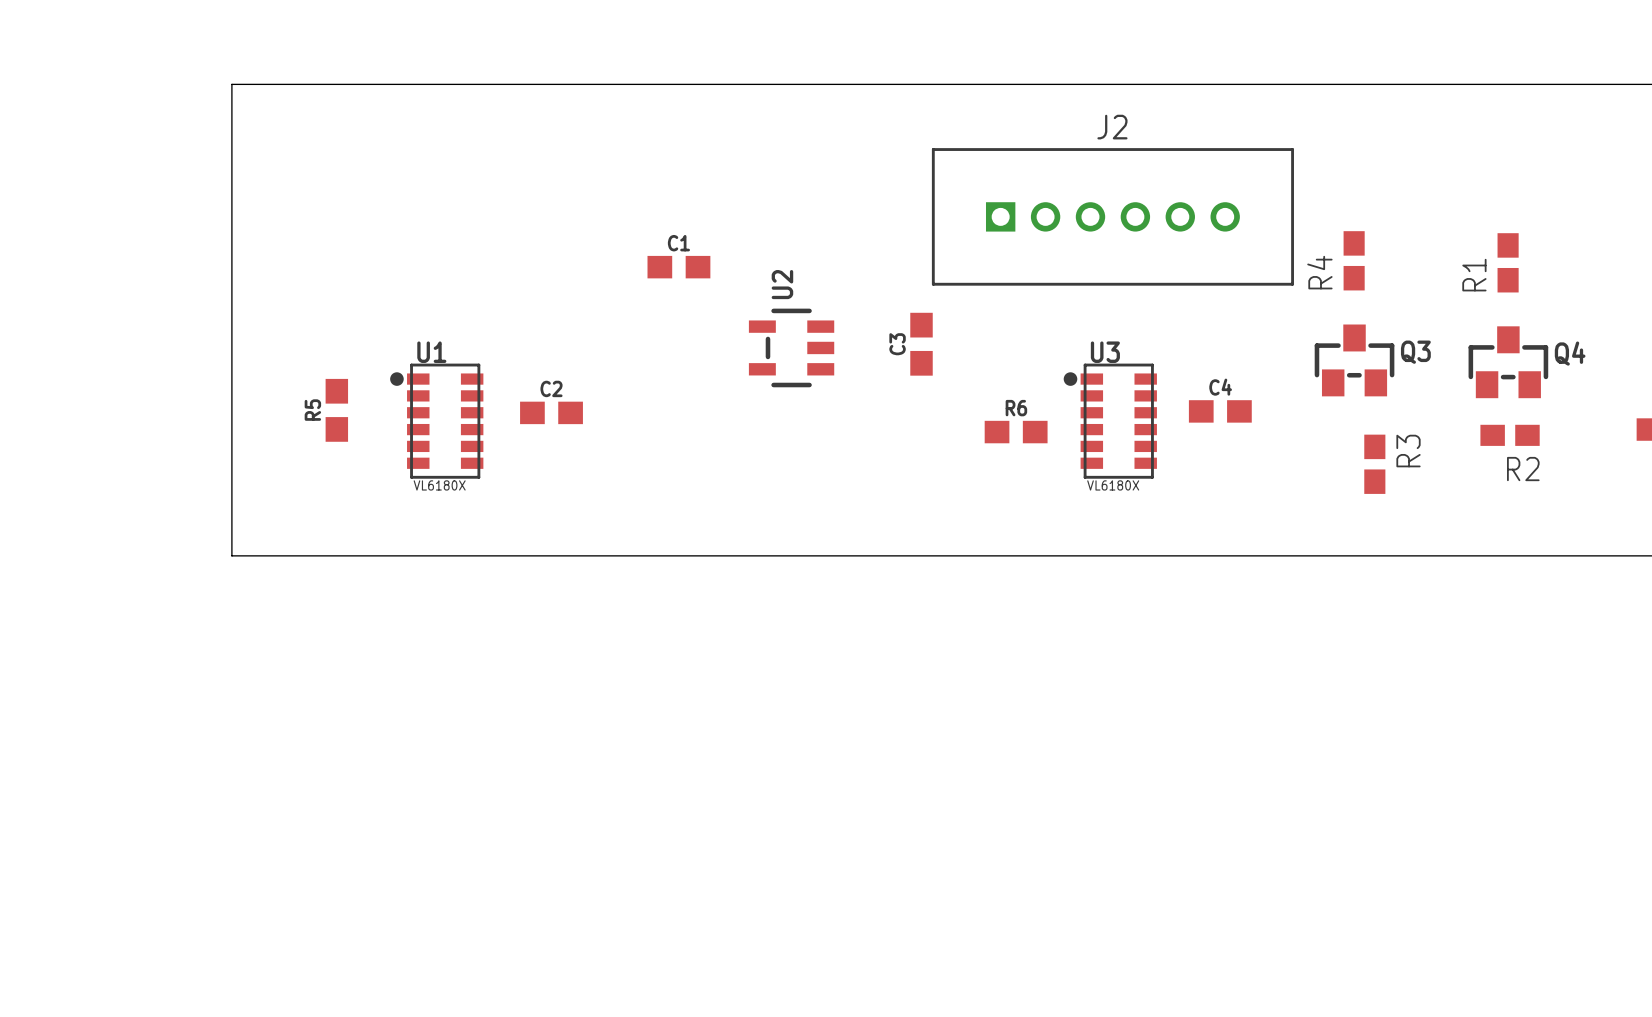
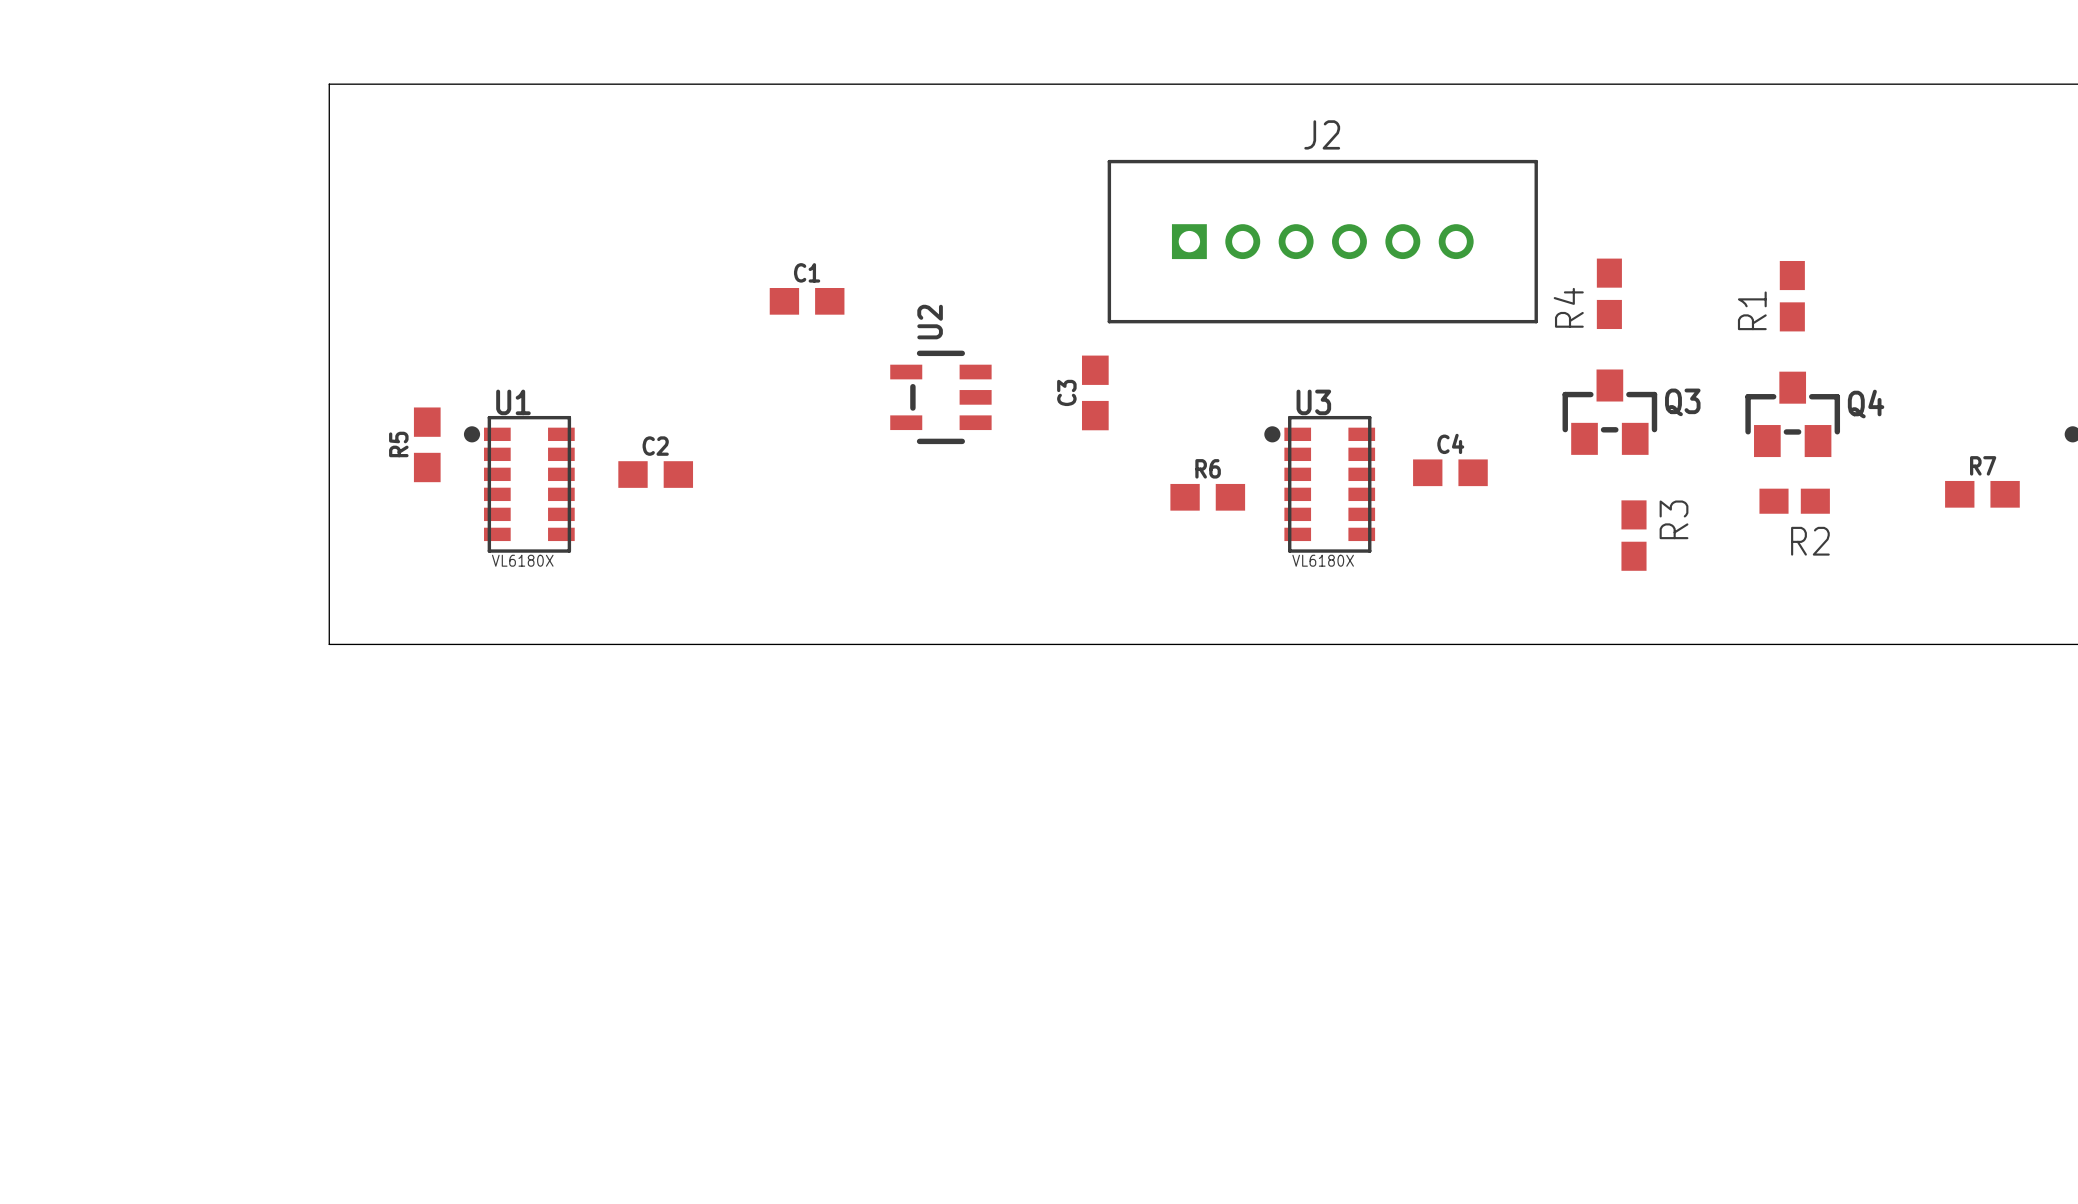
board edge: (276, 84) (231, 84) (231, 555) (276, 555) -> (329, 84) (329, 644)
R5 position: (336, 410) -> (427, 444)

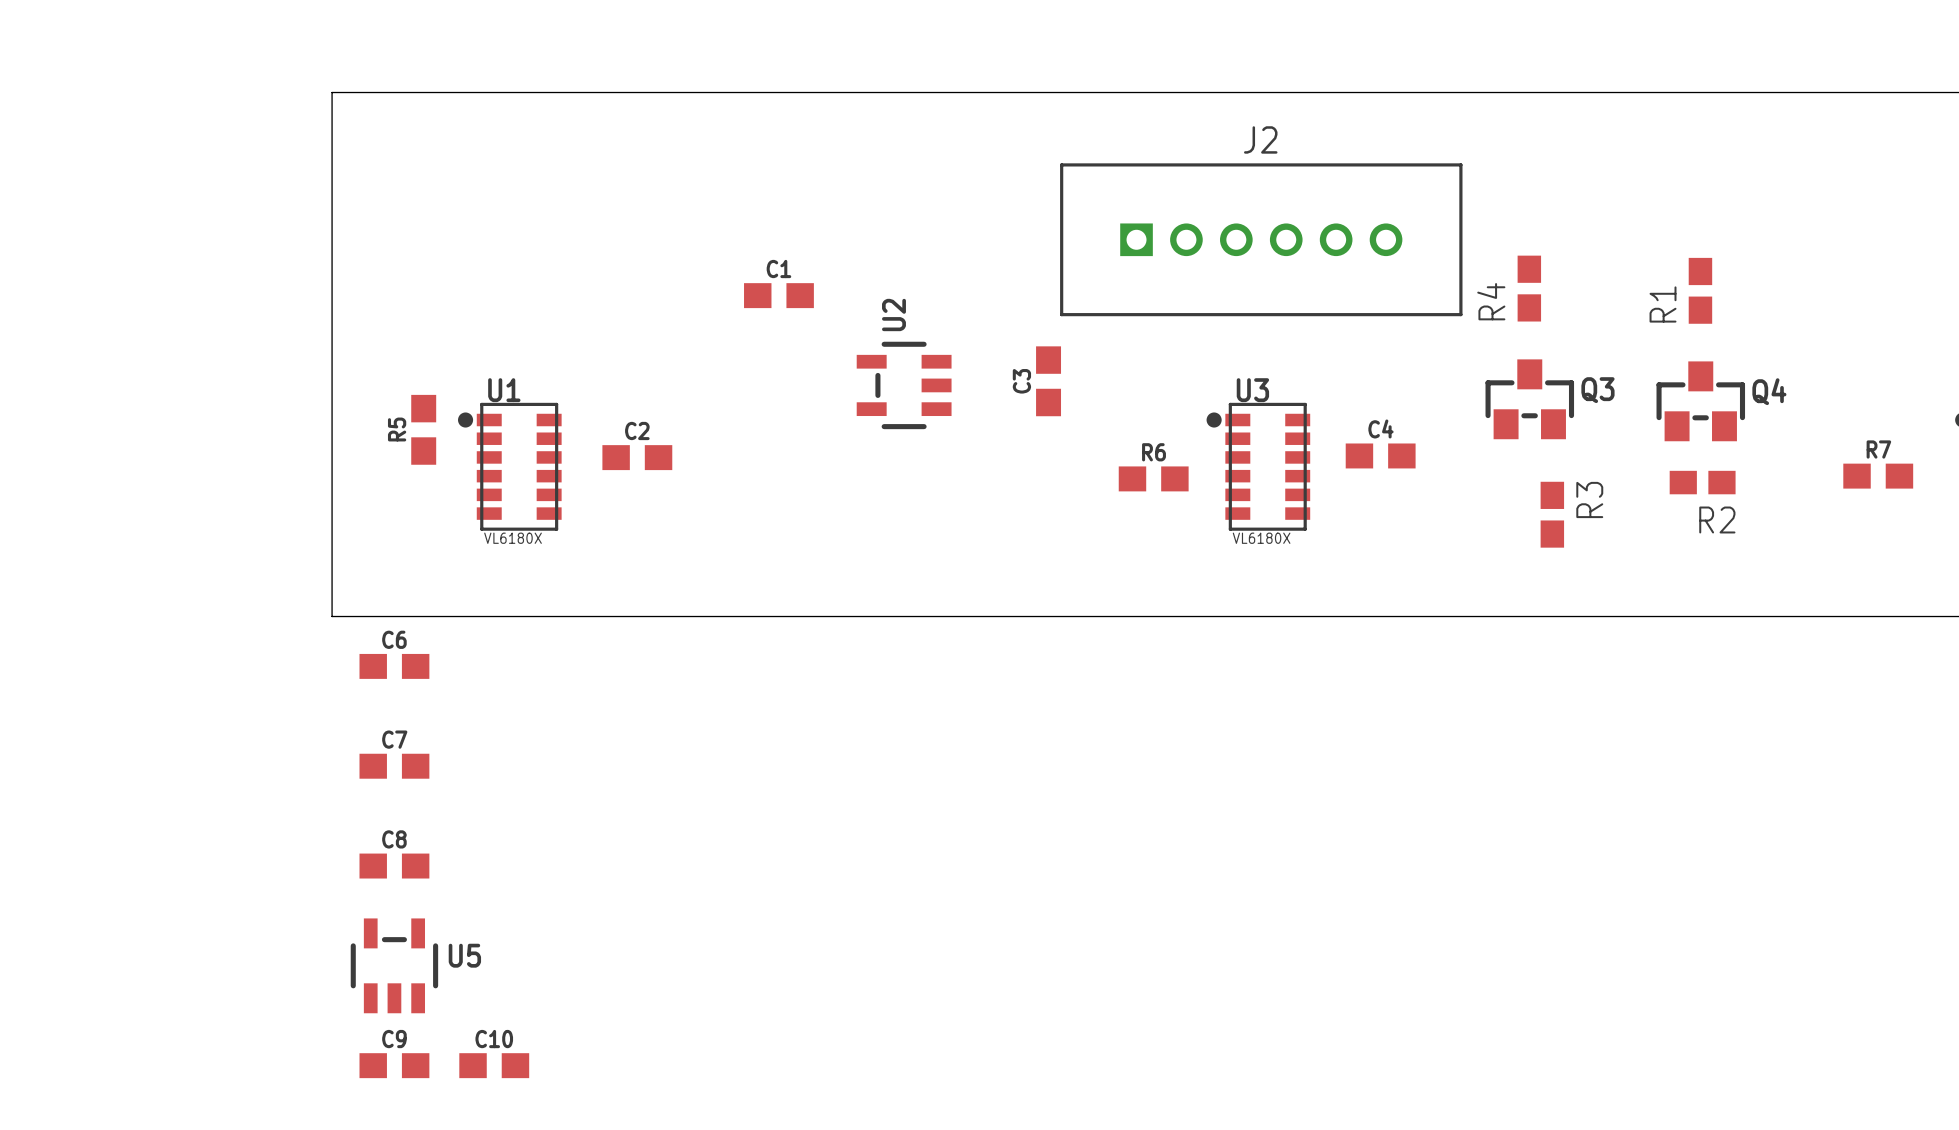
C6: none -> (394, 666)
C7: none -> (394, 766)
C8: none -> (394, 866)
U5: none -> (394, 965)
C9: none -> (394, 1065)
C10: none -> (494, 1065)

